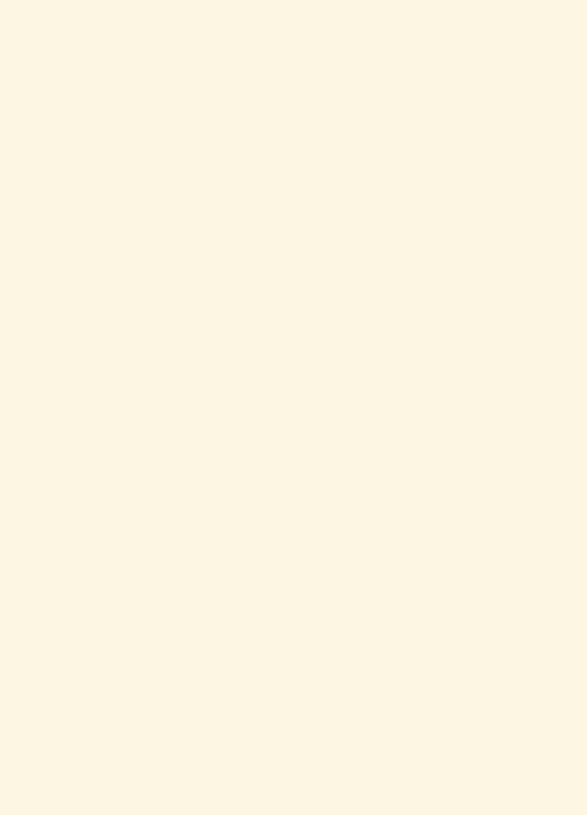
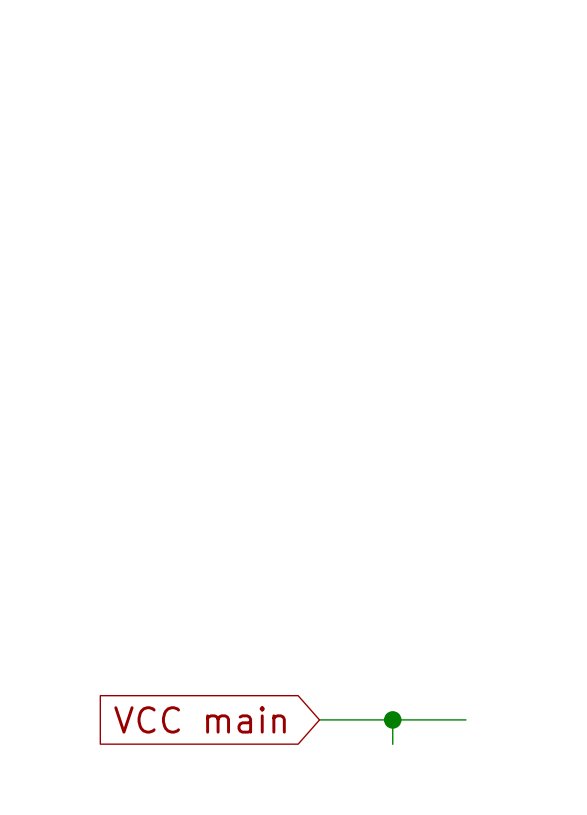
global label: none -> VCC main (200, 719)
wire: none -> (319, 719) (465, 719)
wire: none -> (392, 719) (392, 744)
junction: none -> (392, 719)

